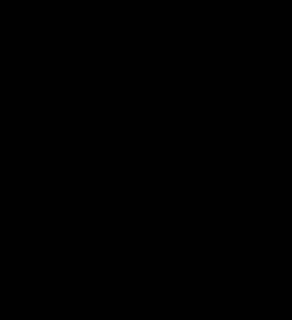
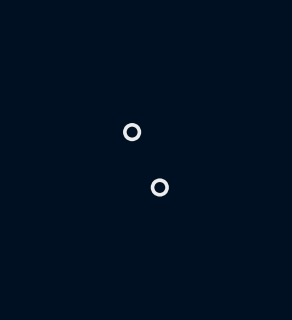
via: none -> (132, 132)
via: none -> (159, 187)

